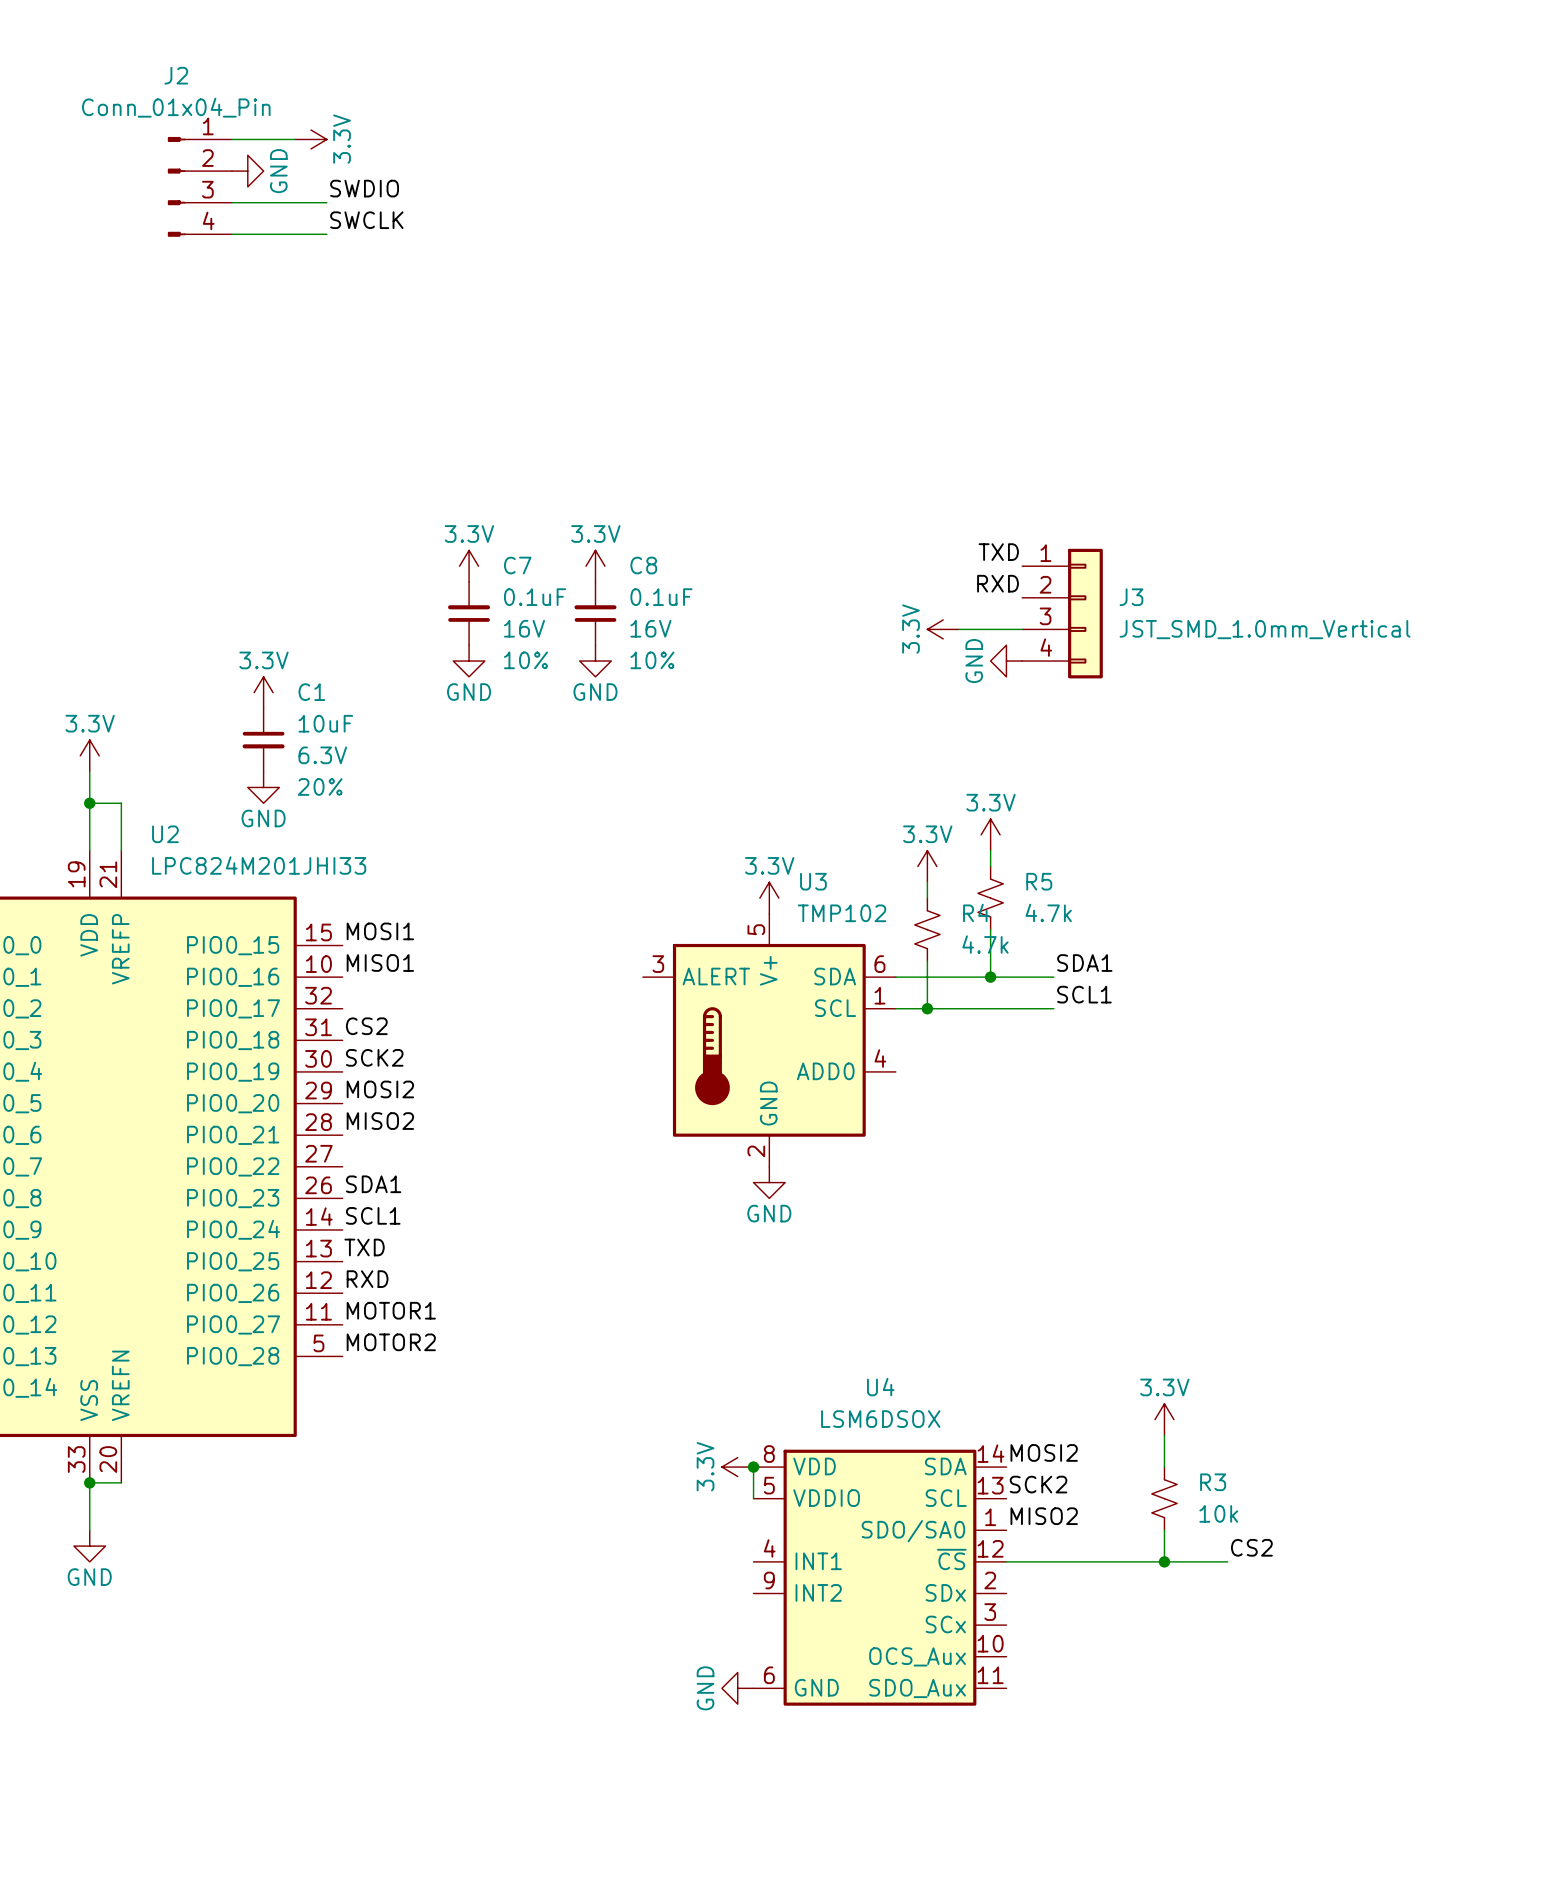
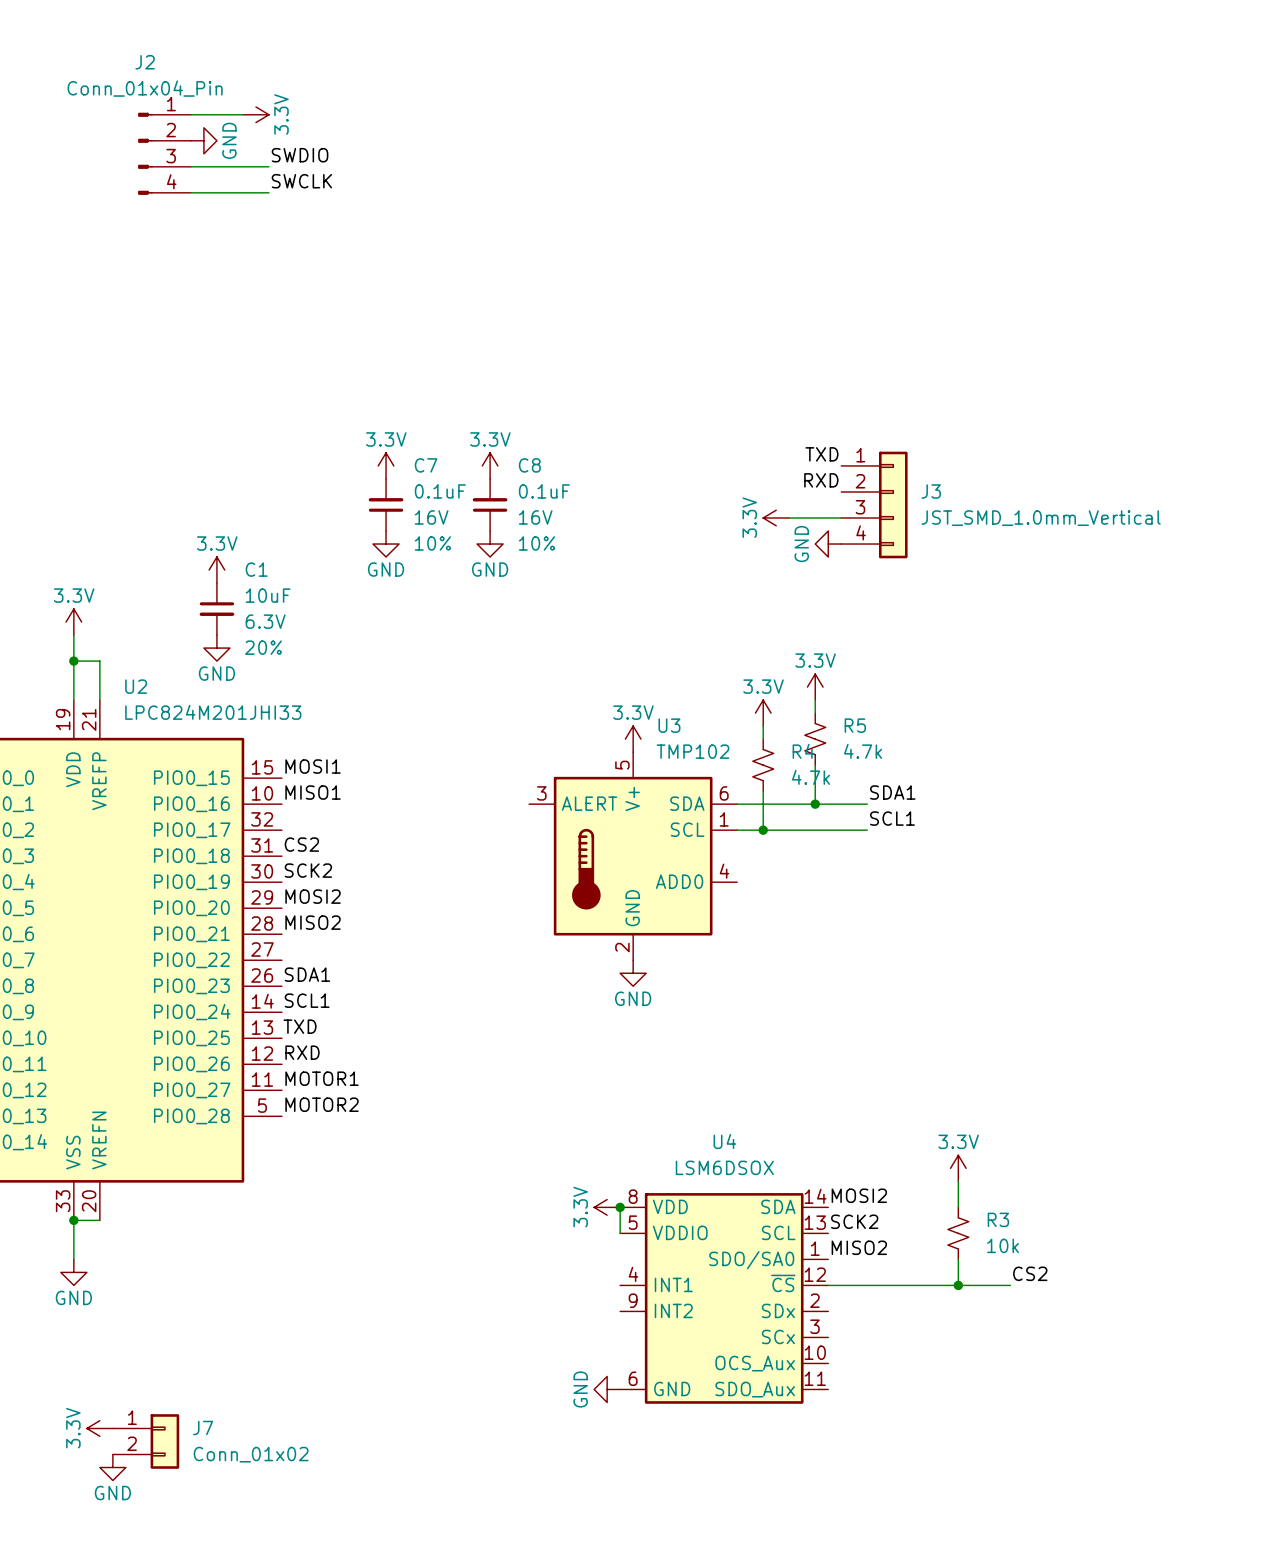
power symbol: none -> 3.3V (99, 1428)
J7: none -> Conn_01x02 (146, 1441)
power symbol: none -> GND (112, 1467)

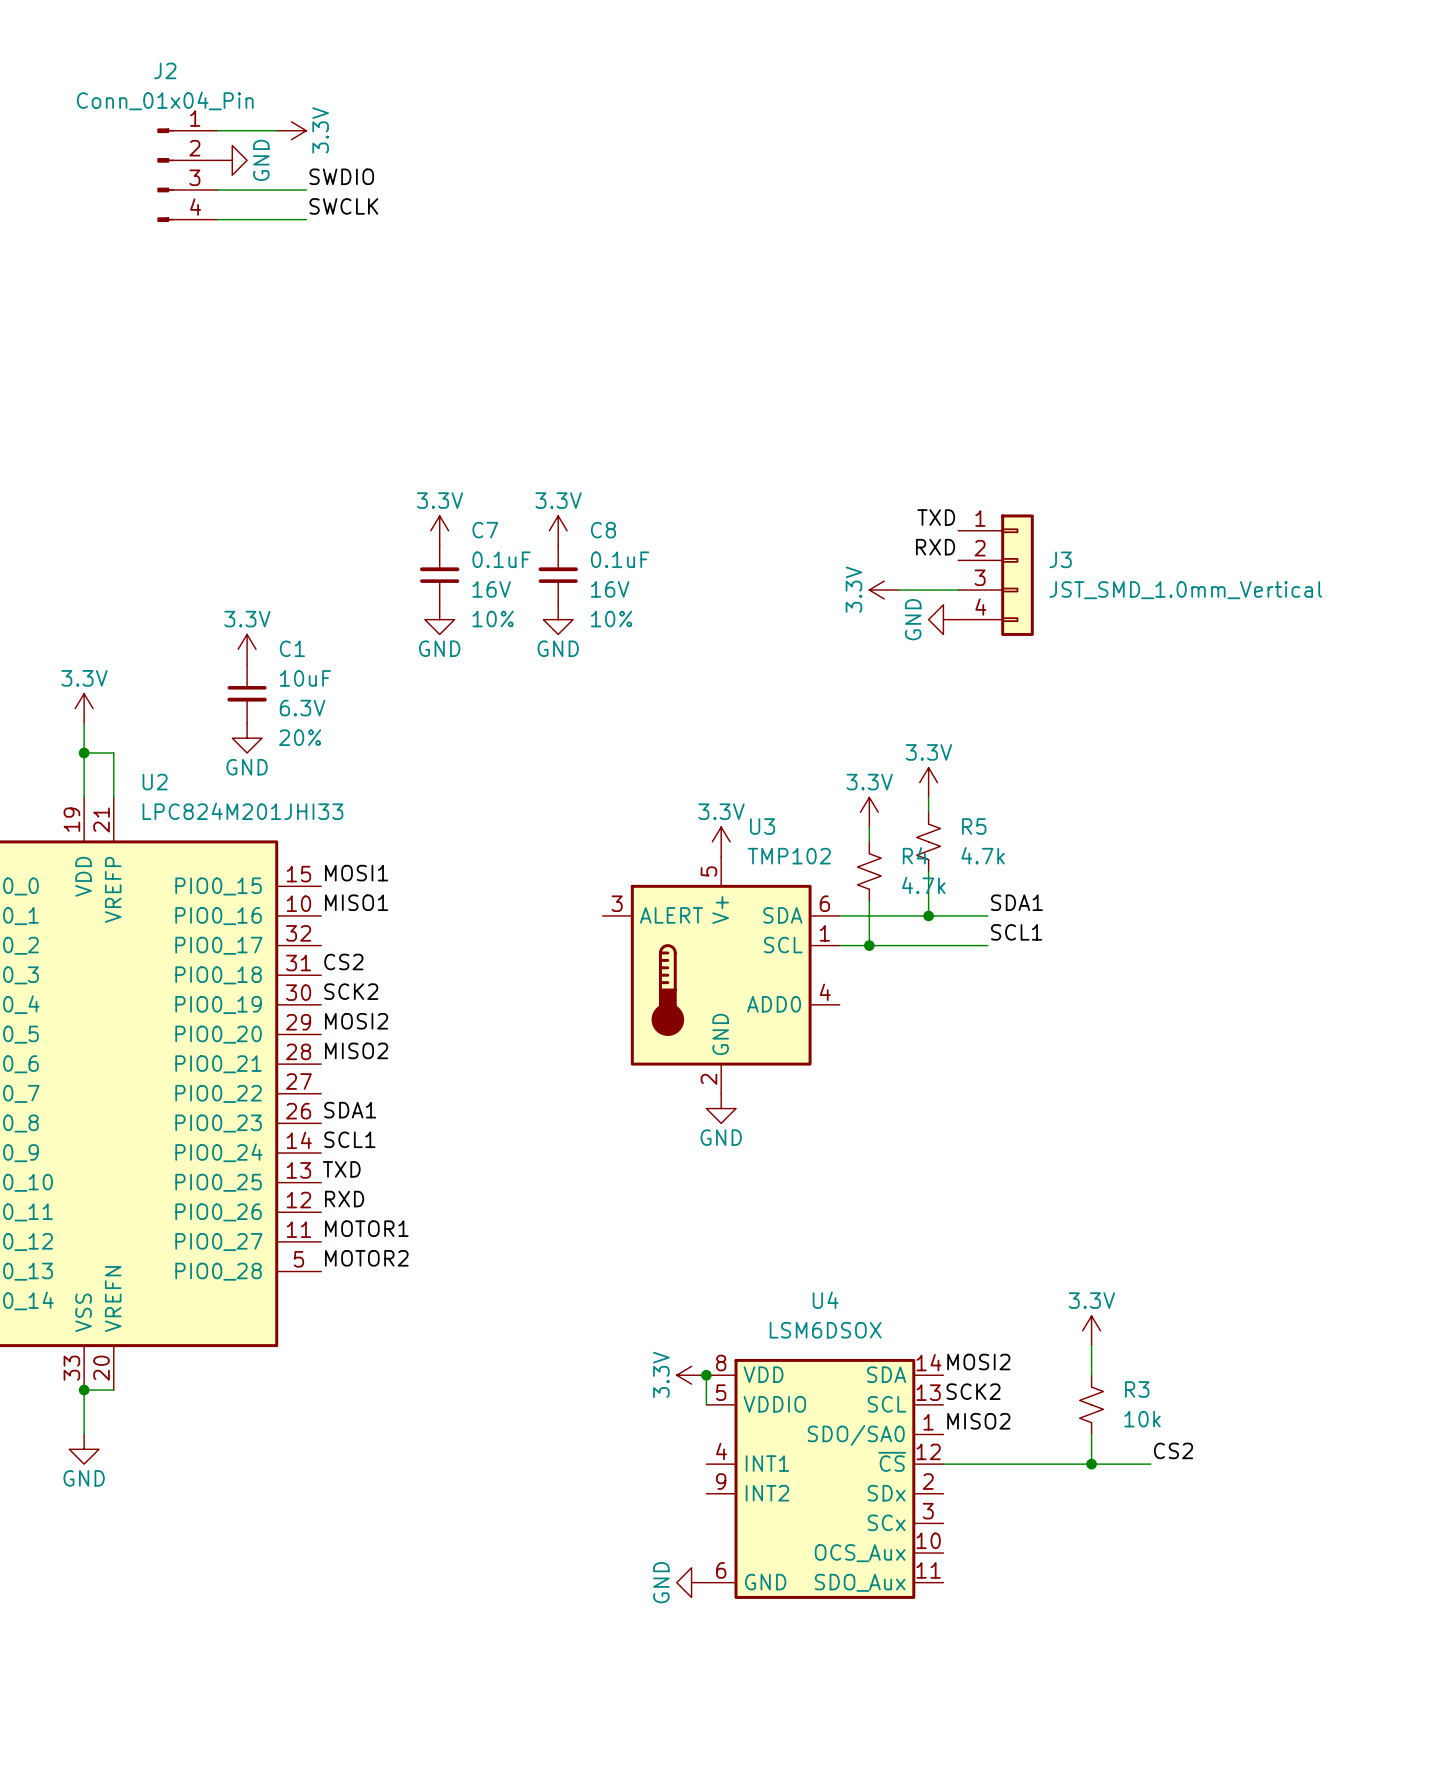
power symbol: 3.3V (99, 1428) -> none
J7: Conn_01x02 (146, 1441) -> none
power symbol: GND (112, 1467) -> none

